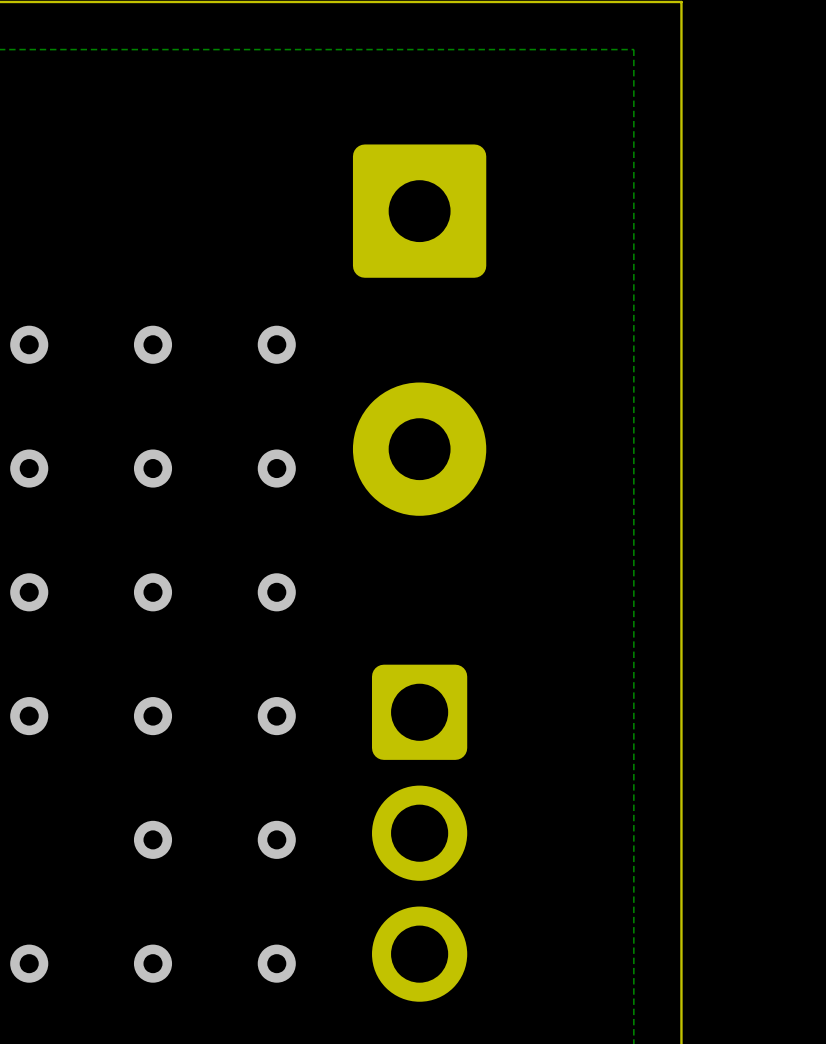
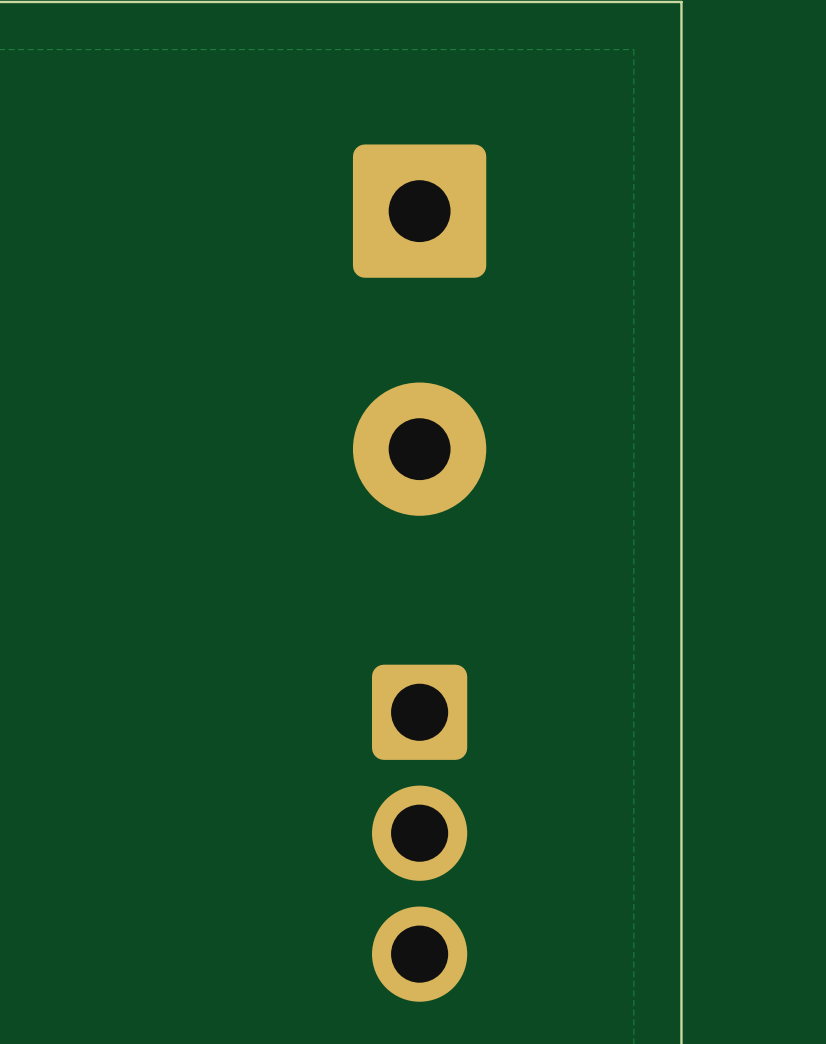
via: (29, 344) -> none
via: (153, 344) -> none
via: (276, 344) -> none
via: (29, 468) -> none
via: (153, 468) -> none
via: (276, 468) -> none
via: (29, 592) -> none
via: (153, 592) -> none
via: (276, 592) -> none
via: (29, 716) -> none
via: (153, 716) -> none
via: (276, 716) -> none
via: (153, 839) -> none
via: (276, 839) -> none
via: (29, 963) -> none
via: (153, 963) -> none
via: (276, 963) -> none

